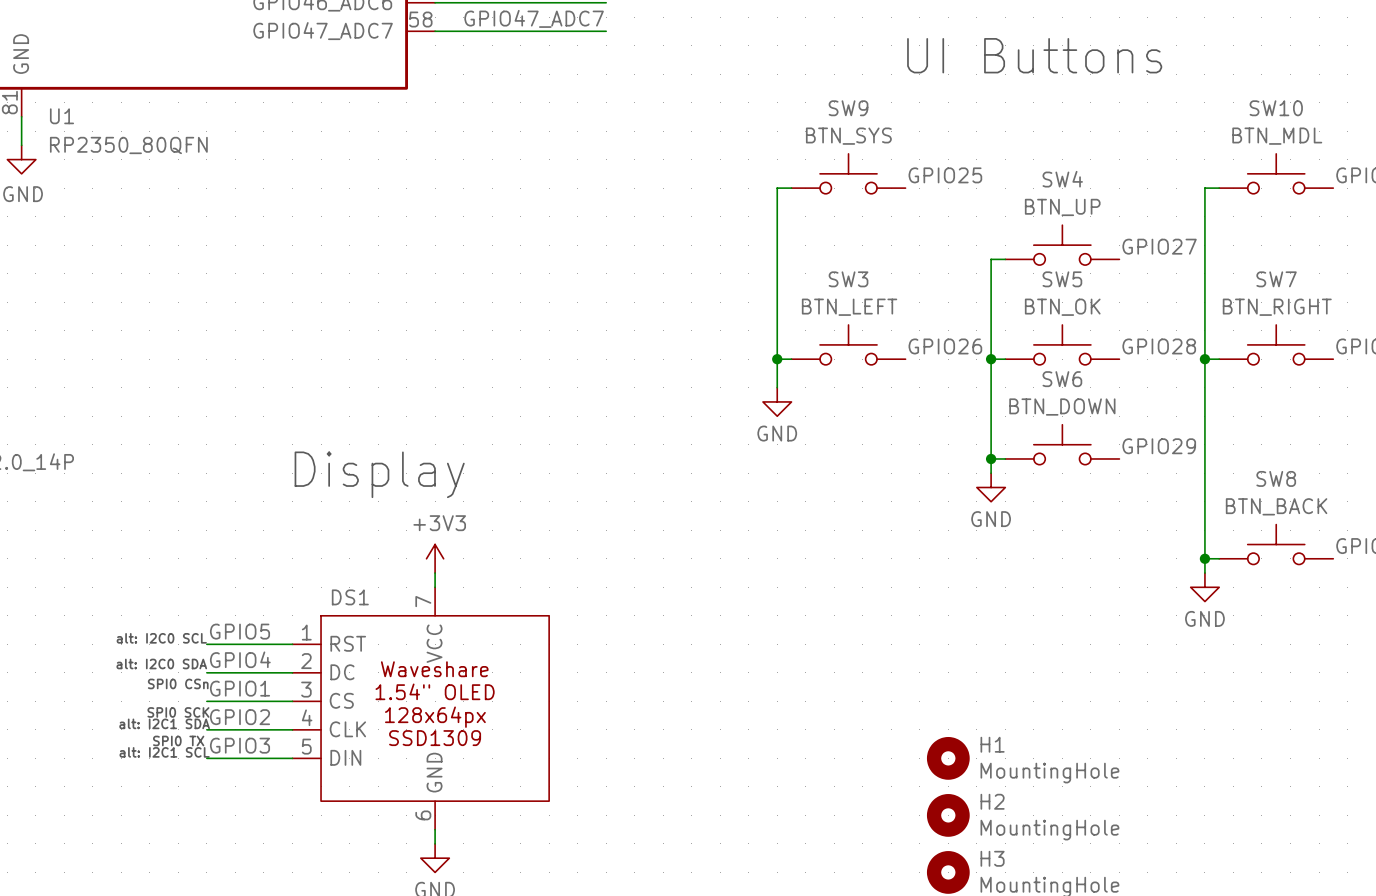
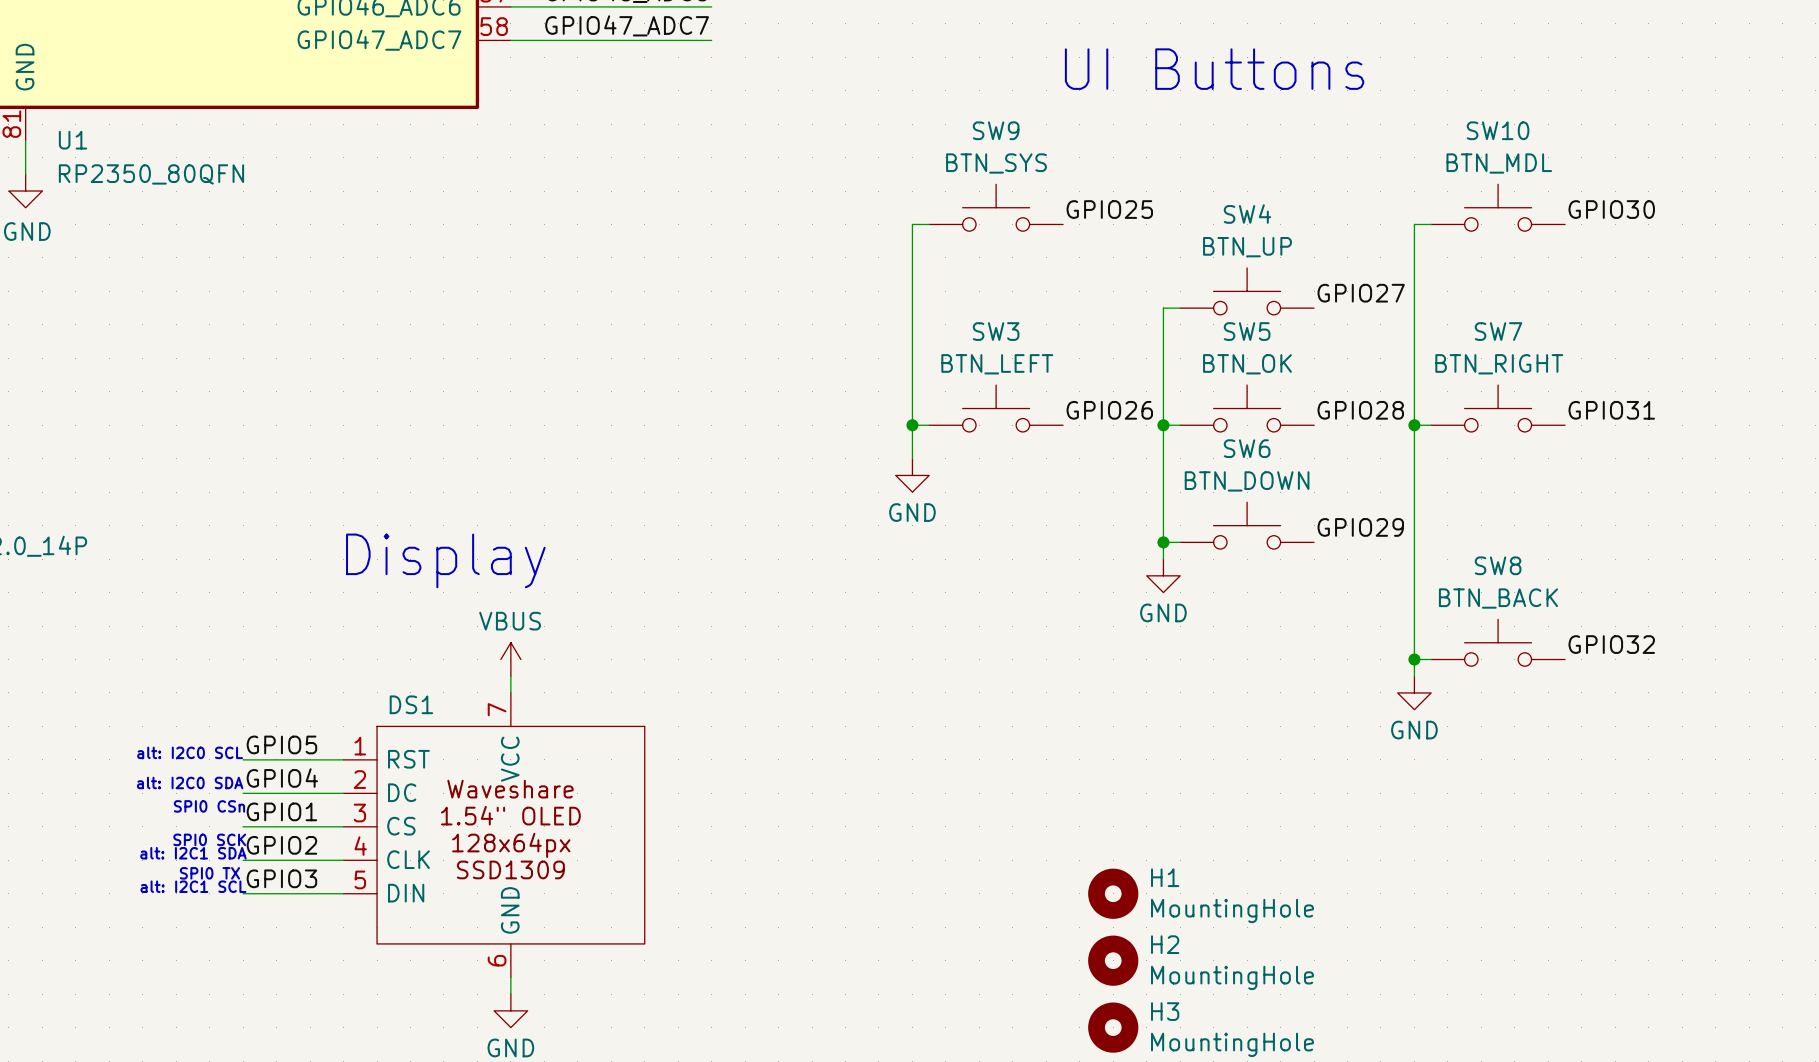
power symbol: +3V3 (435, 558) -> VBUS (510, 659)

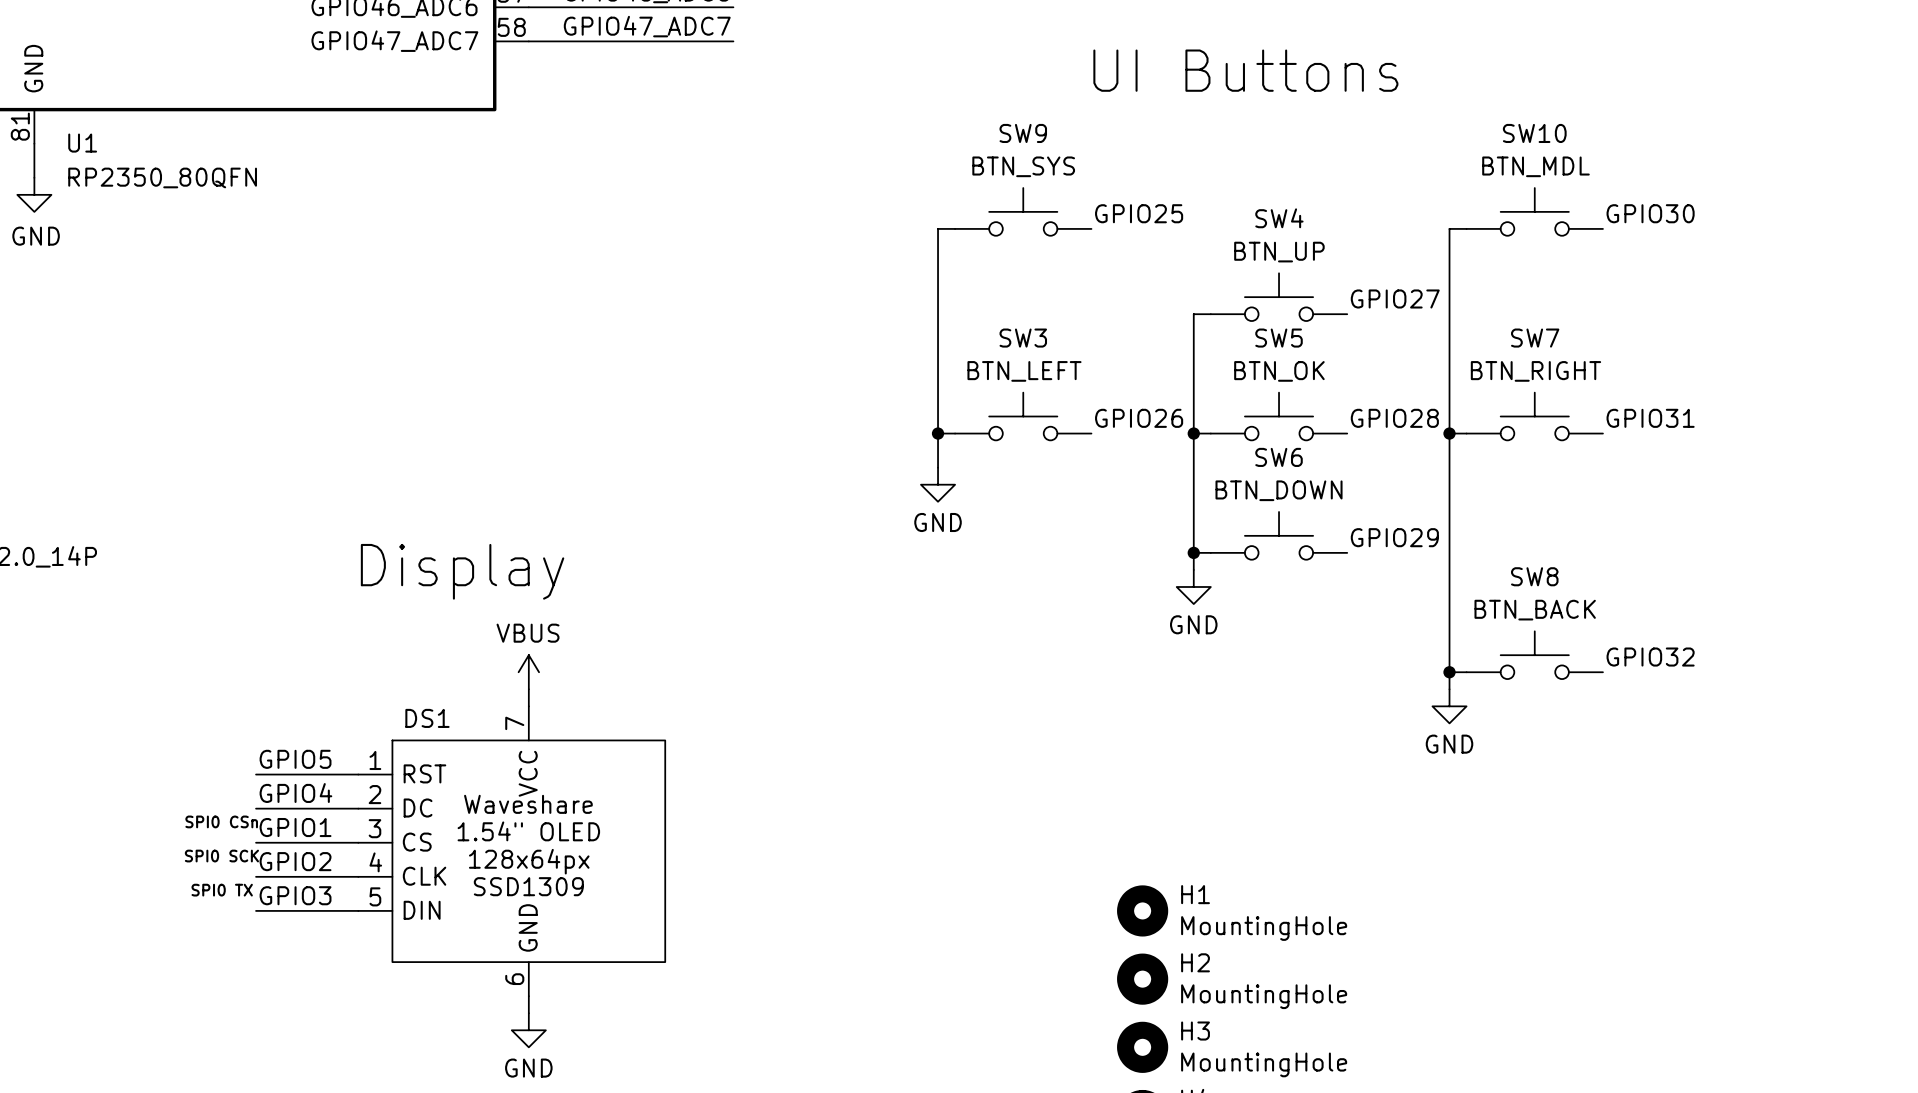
text: alt: I2C0 SCL (190, 752) -> none
text: alt: I2C0 SDA (190, 782) -> none
text: alt: I2C1 SDA (193, 853) -> none
text: alt: I2C1 SCL (193, 886) -> none

